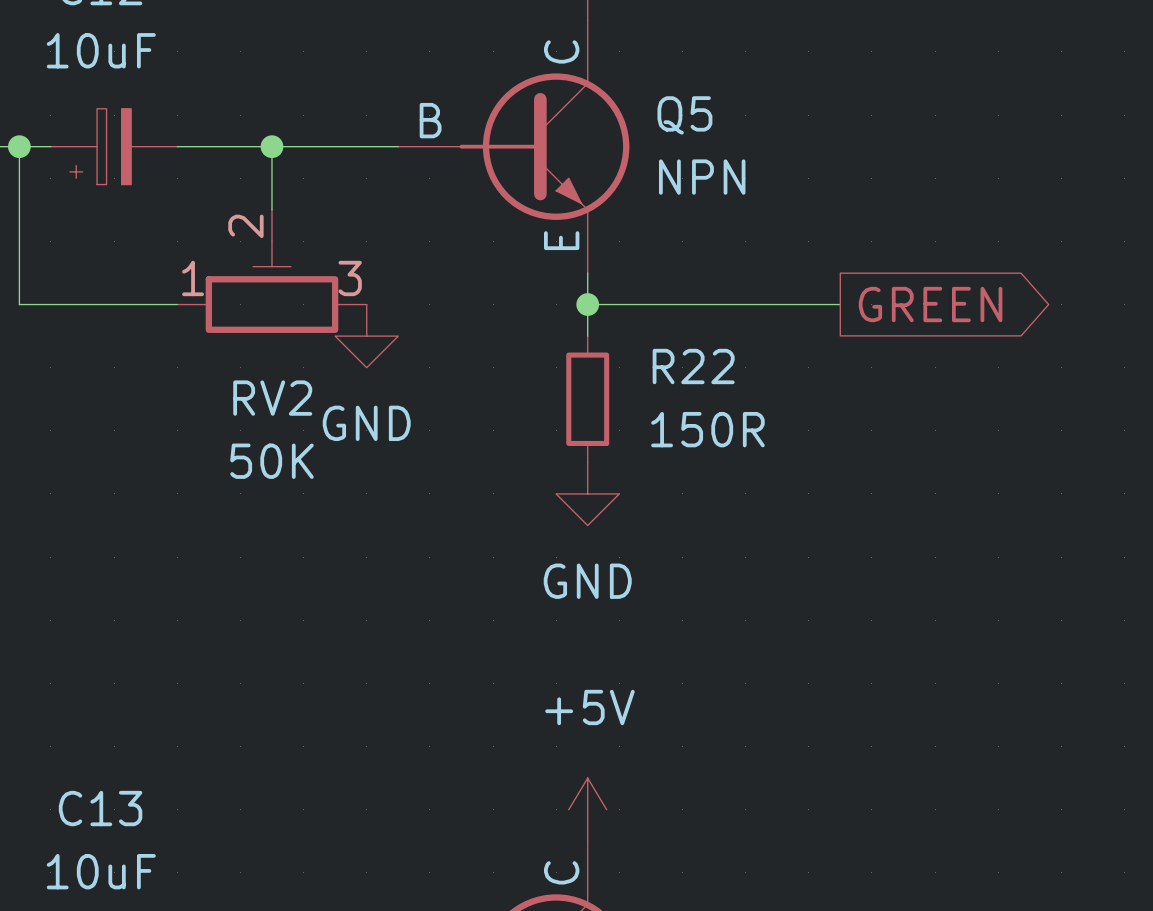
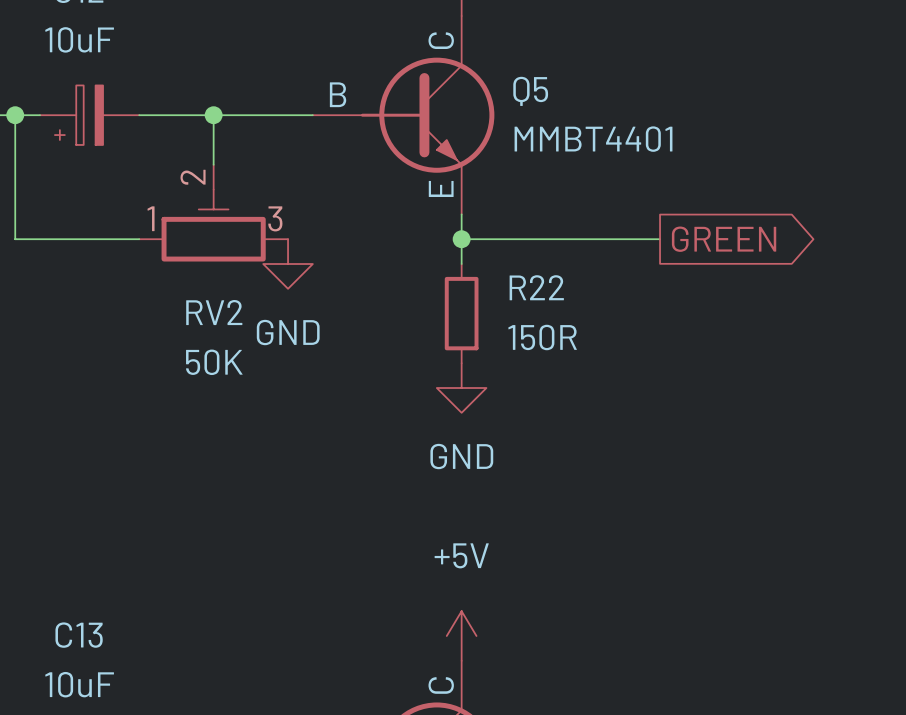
Q5 value: NPN (702, 177) -> MMBT4401 (593, 139)

